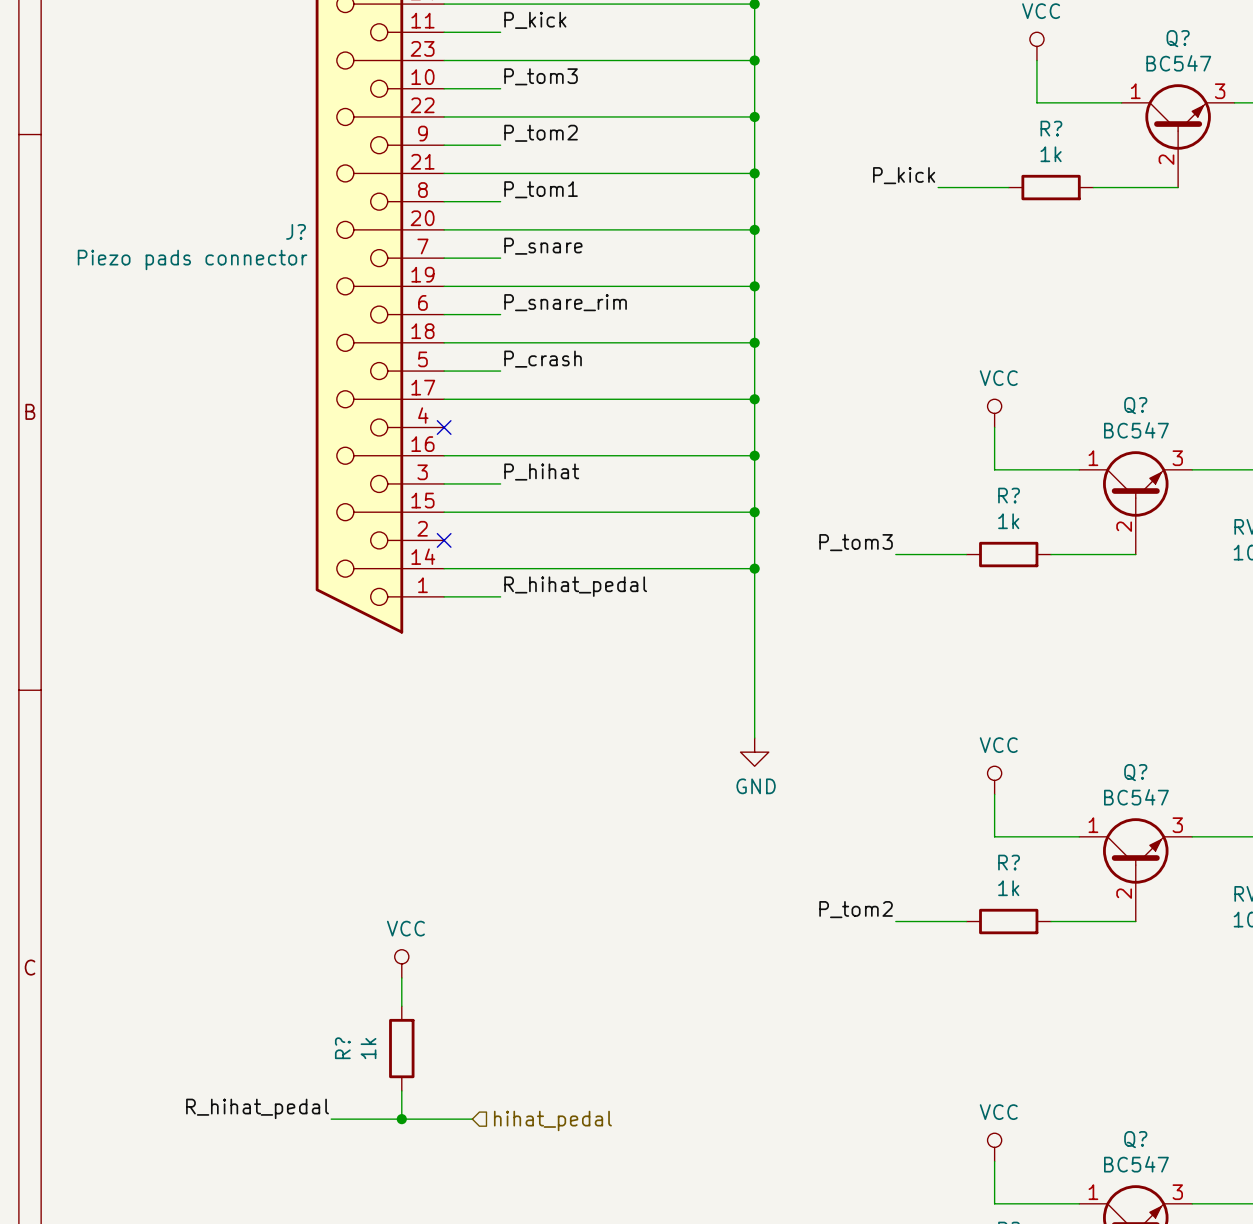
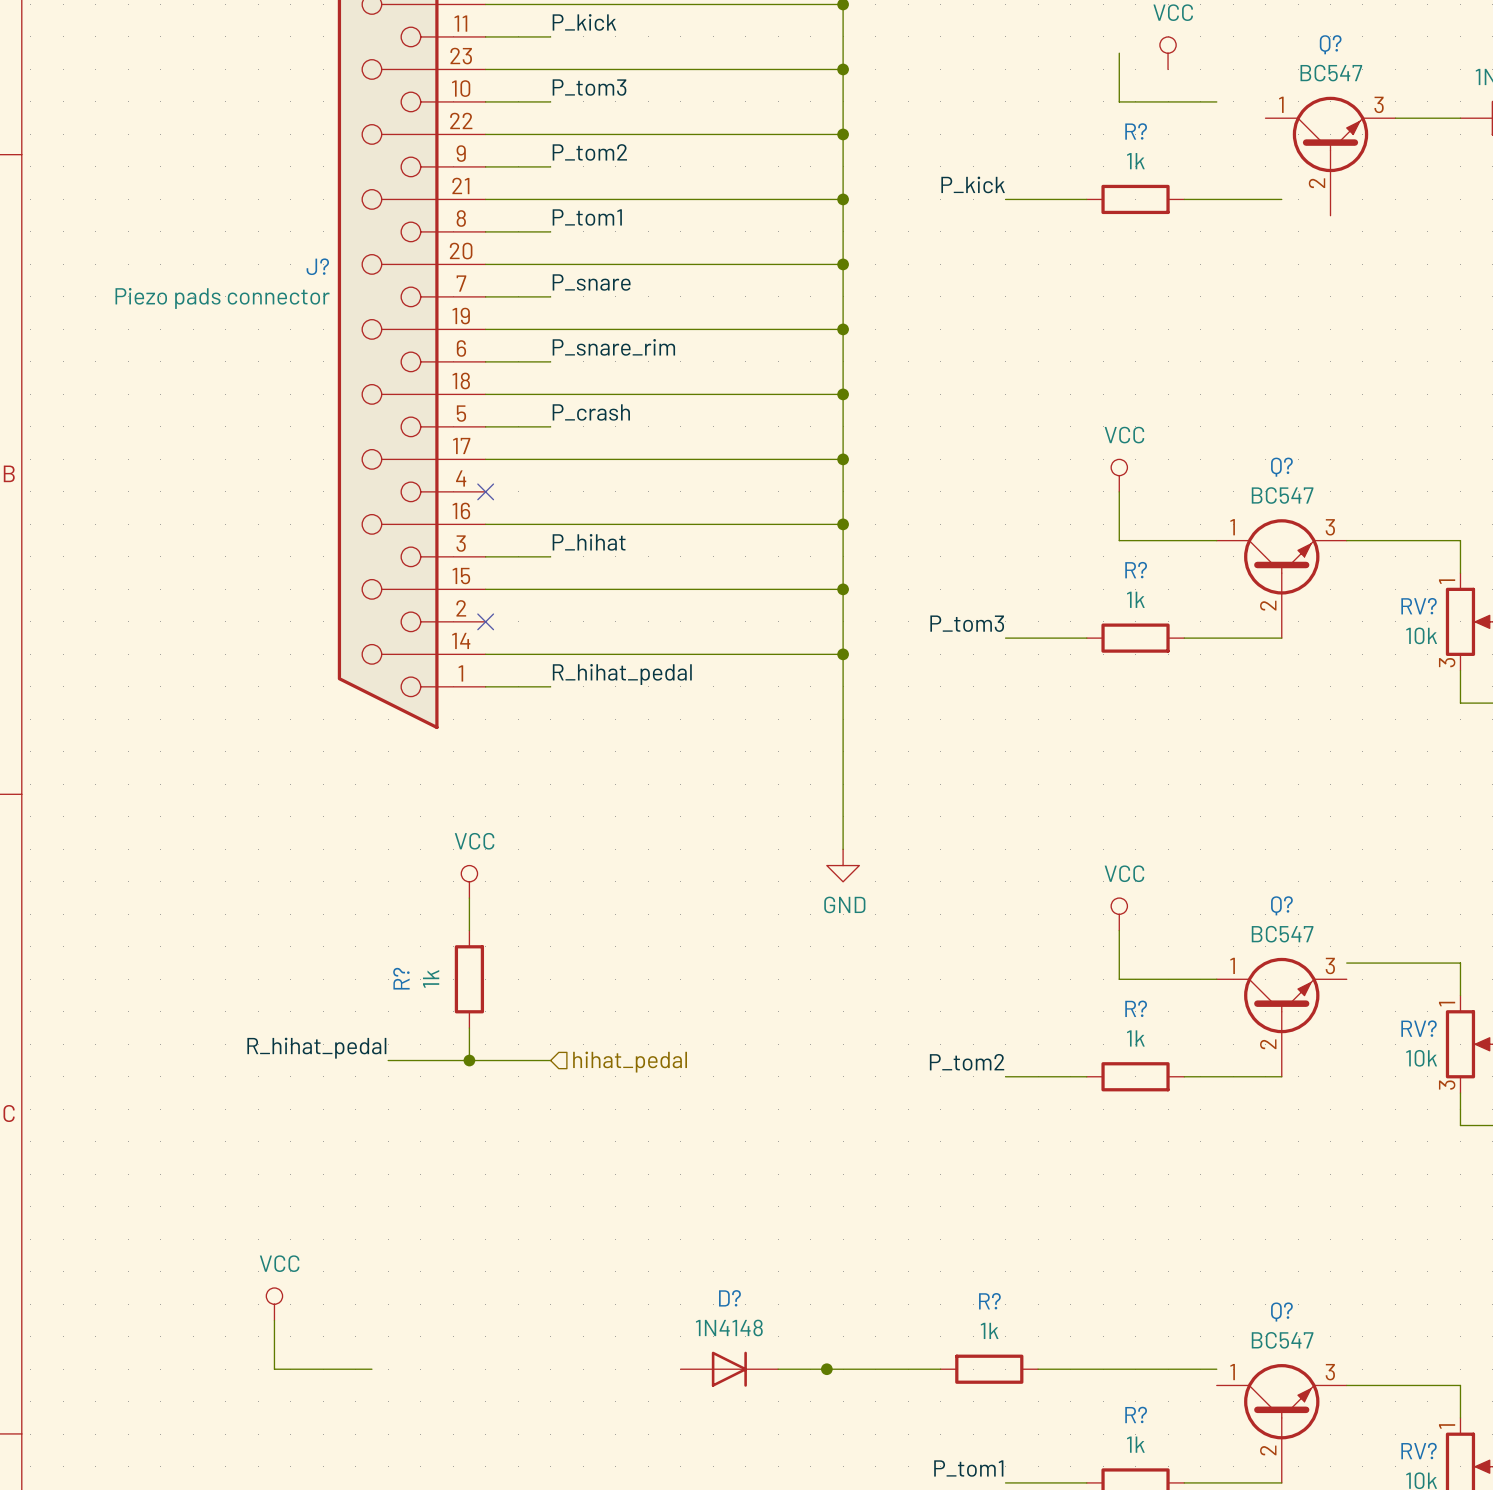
wire: (1036, 60) (1036, 102) (1121, 102) -> (1119, 53) (1119, 101) (1216, 101)
label position: P_kick (904, 175) -> P_kick (973, 184)
wire: (938, 187) (1008, 187) -> (1005, 199) (1086, 199)
R? position: (1051, 187) -> (1135, 199)
wire: (1093, 187) (1178, 187) -> (1184, 199) (1281, 199)
power symbol: none -> VCC (469, 881)
power symbol position: VCC (994, 780) -> VCC (1119, 914)
wire: (994, 836) (1079, 836) -> (1119, 963) (1119, 979) (1216, 979)
Q? position: (1135, 869) -> (1281, 1017)
label position: P_tom2 (856, 909) -> P_tom2 (967, 1062)
junction: none -> (469, 1060)
wire: (895, 921) (966, 921) -> (1005, 1076) (1086, 1076)
R? position: (1008, 921) -> (1135, 1076)
wire: (1051, 921) (1135, 921) -> (1184, 1076) (1281, 1076)
power symbol: VCC (401, 963) -> none
wire: (401, 977) (401, 1006) -> (469, 898) (469, 930)
R? position: (401, 1048) -> (469, 979)
wire: (401, 1090) (401, 1119) -> (469, 1028) (469, 1060)
label position: R_hihat_pedal (257, 1108) -> R_hihat_pedal (316, 1048)
wire: (331, 1119) (472, 1119) -> (388, 1060) (550, 1060)
junction: (401, 1119) -> none
hierarchical label position: hihat_pedal (552, 1120) -> hihat_pedal (630, 1062)
power symbol: none -> VCC (274, 1304)
wire: none -> (274, 1320) (274, 1369) (371, 1369)
power symbol: VCC (994, 1147) -> none
wire: (994, 1161) (994, 1203) (1079, 1203) -> none
D?: none -> 1N4148 (729, 1369)
wire: none -> (778, 1369) (940, 1369)
junction: none -> (826, 1369)
R?: none -> 1k (989, 1369)
wire: none -> (1038, 1369) (1216, 1369)

